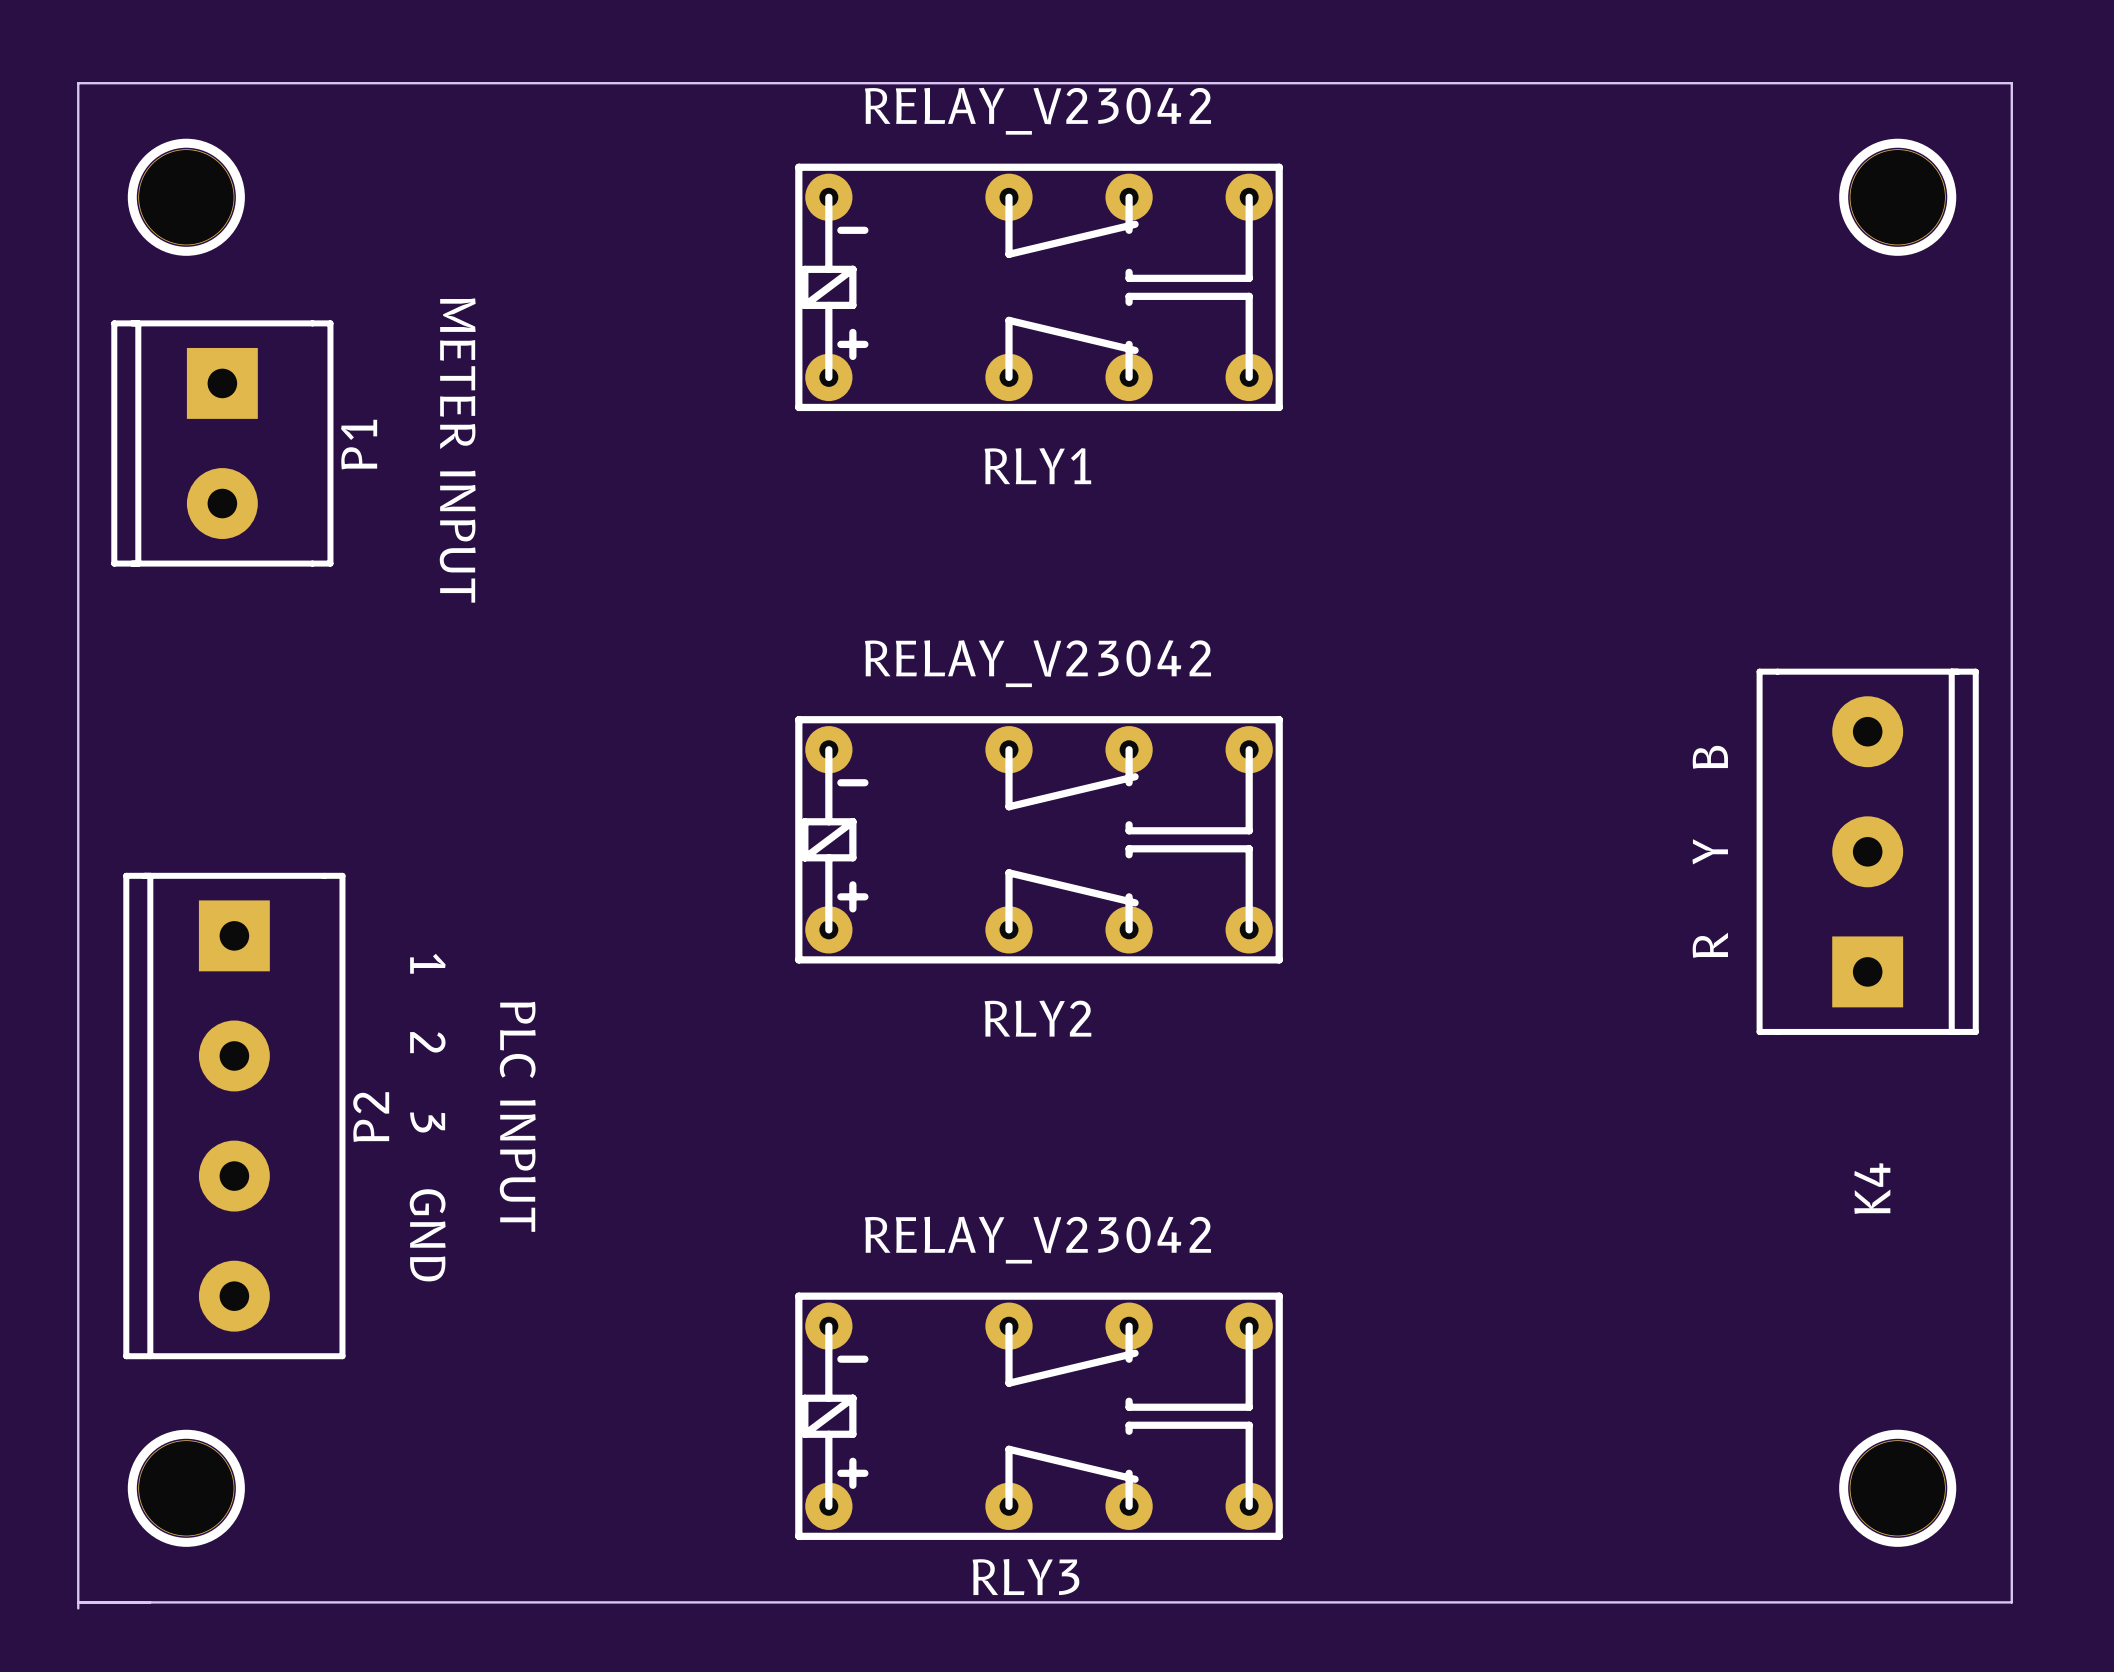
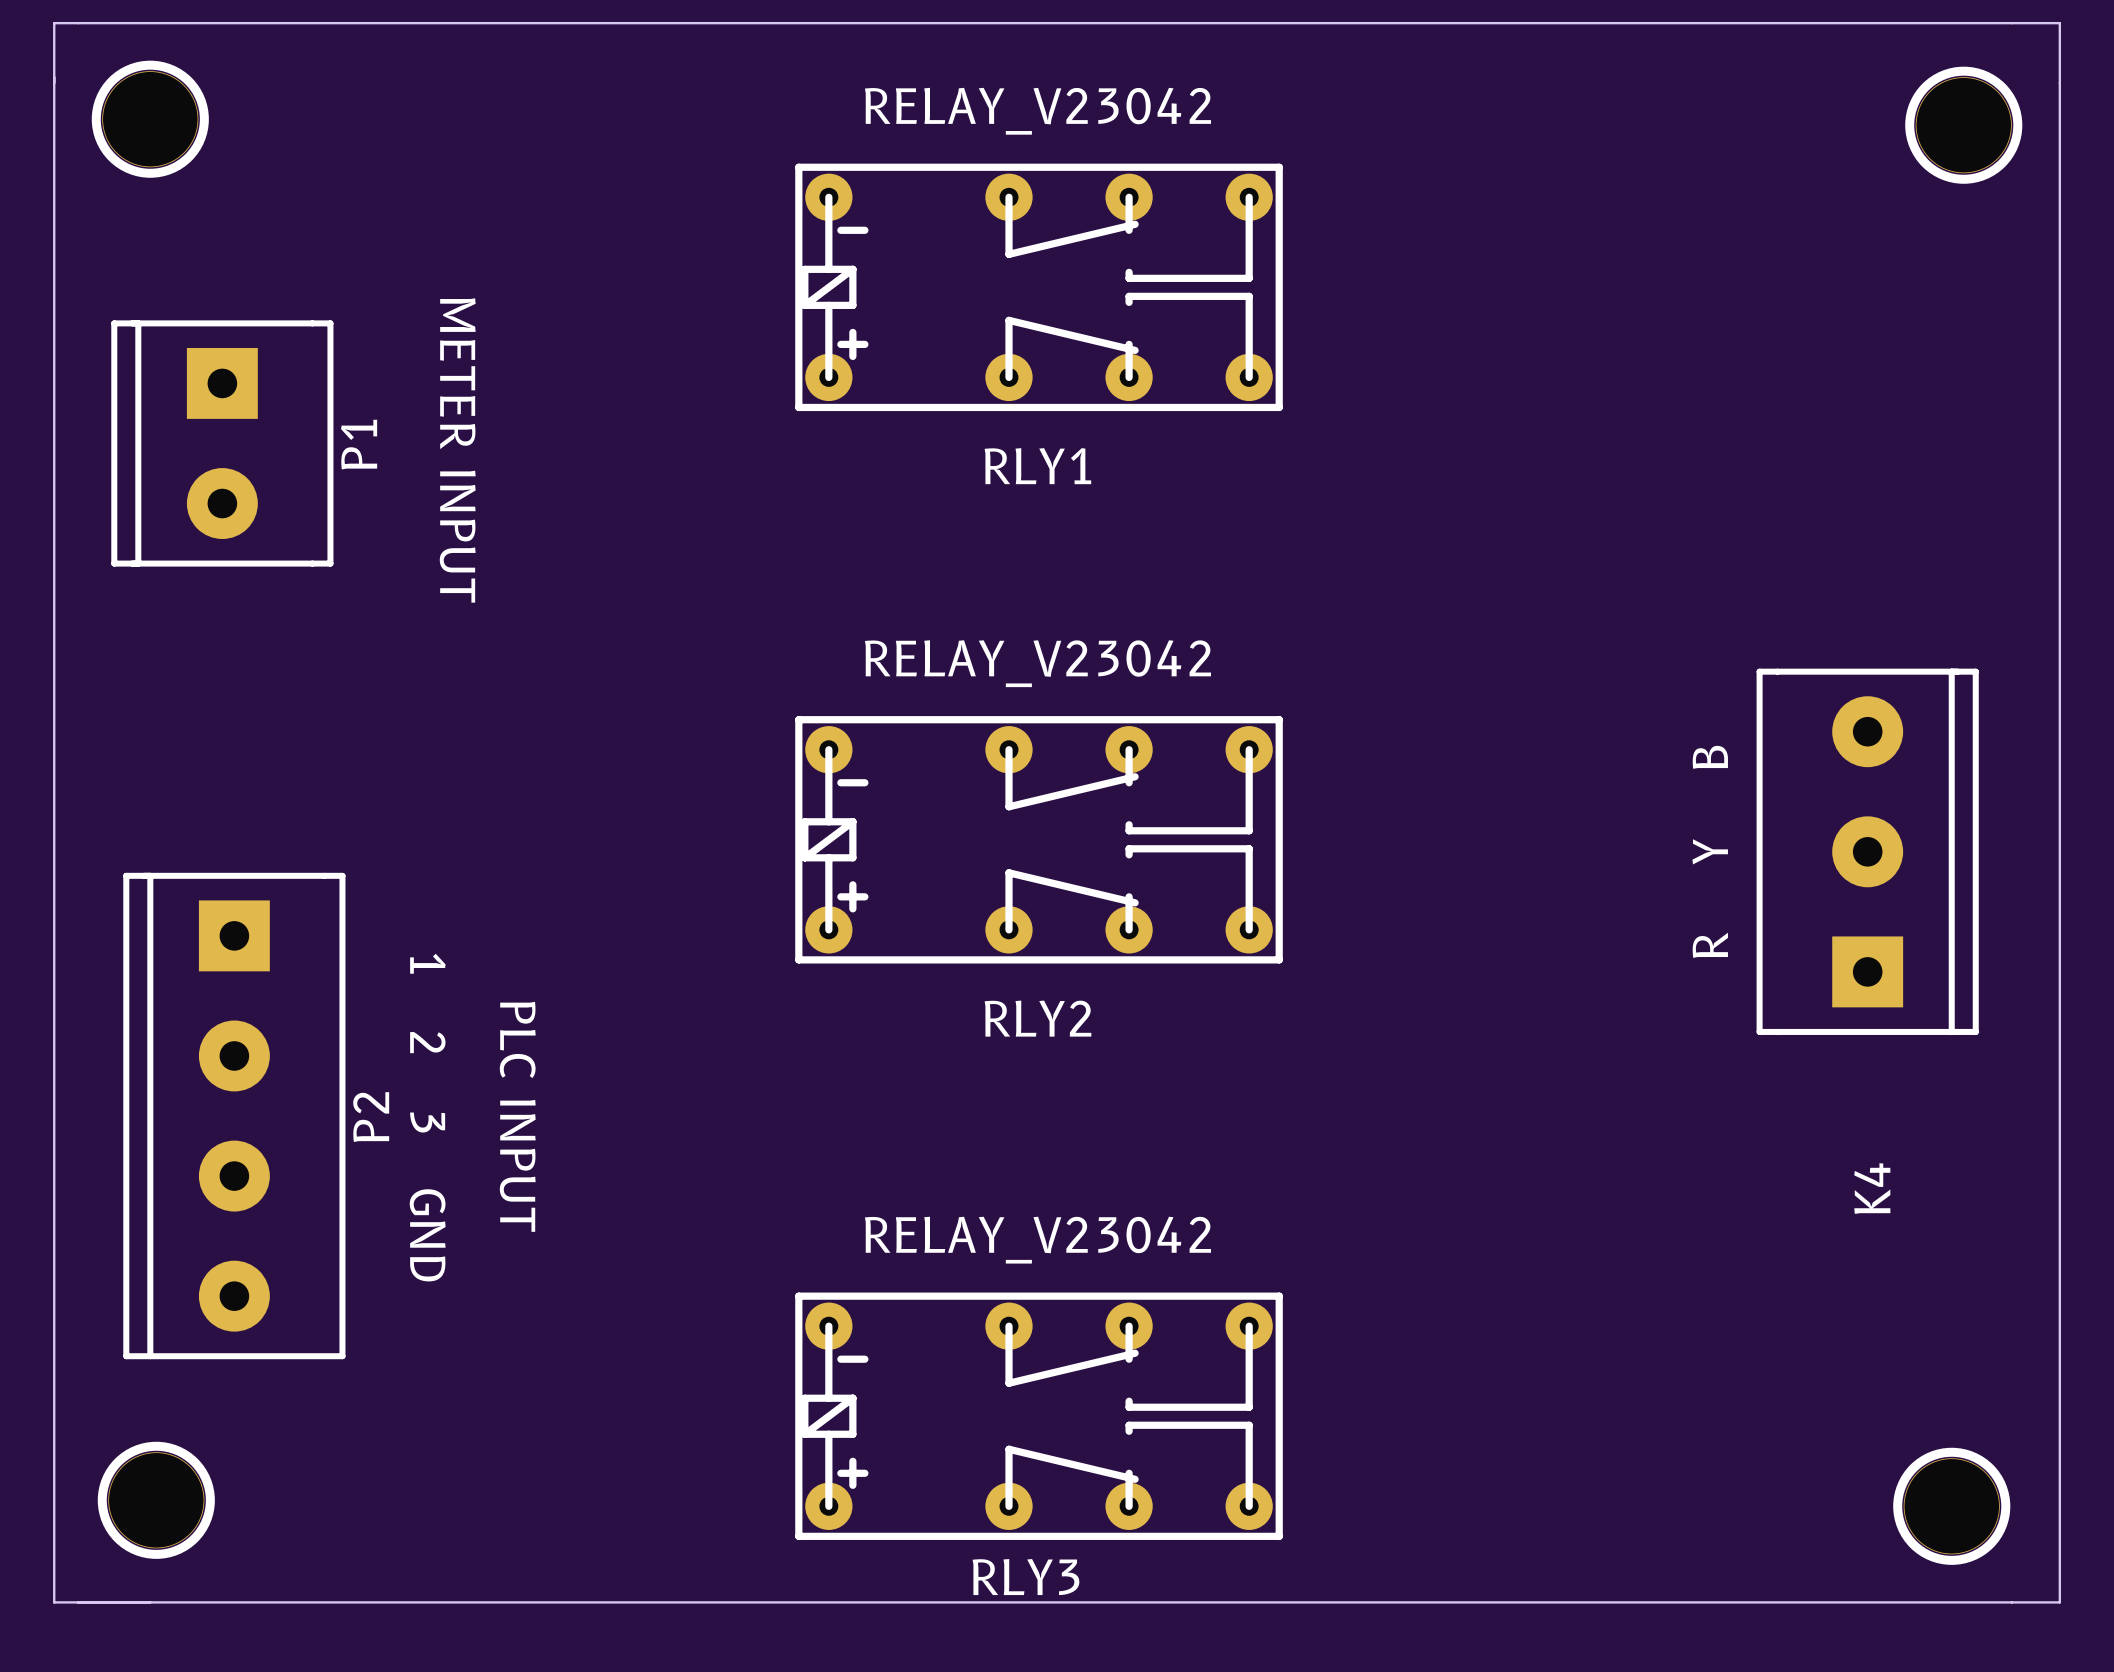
part position: (186, 197) -> (150, 119)
part position: (1897, 197) -> (1963, 125)
part position: (186, 1488) -> (156, 1500)
part position: (1897, 1488) -> (1951, 1506)
board edge: (2011, 1602) (2011, 83) (78, 83) (78, 1608) -> (2011, 1602) (2059, 1602) (2059, 23) (54, 23) (54, 1602) (78, 1602)

